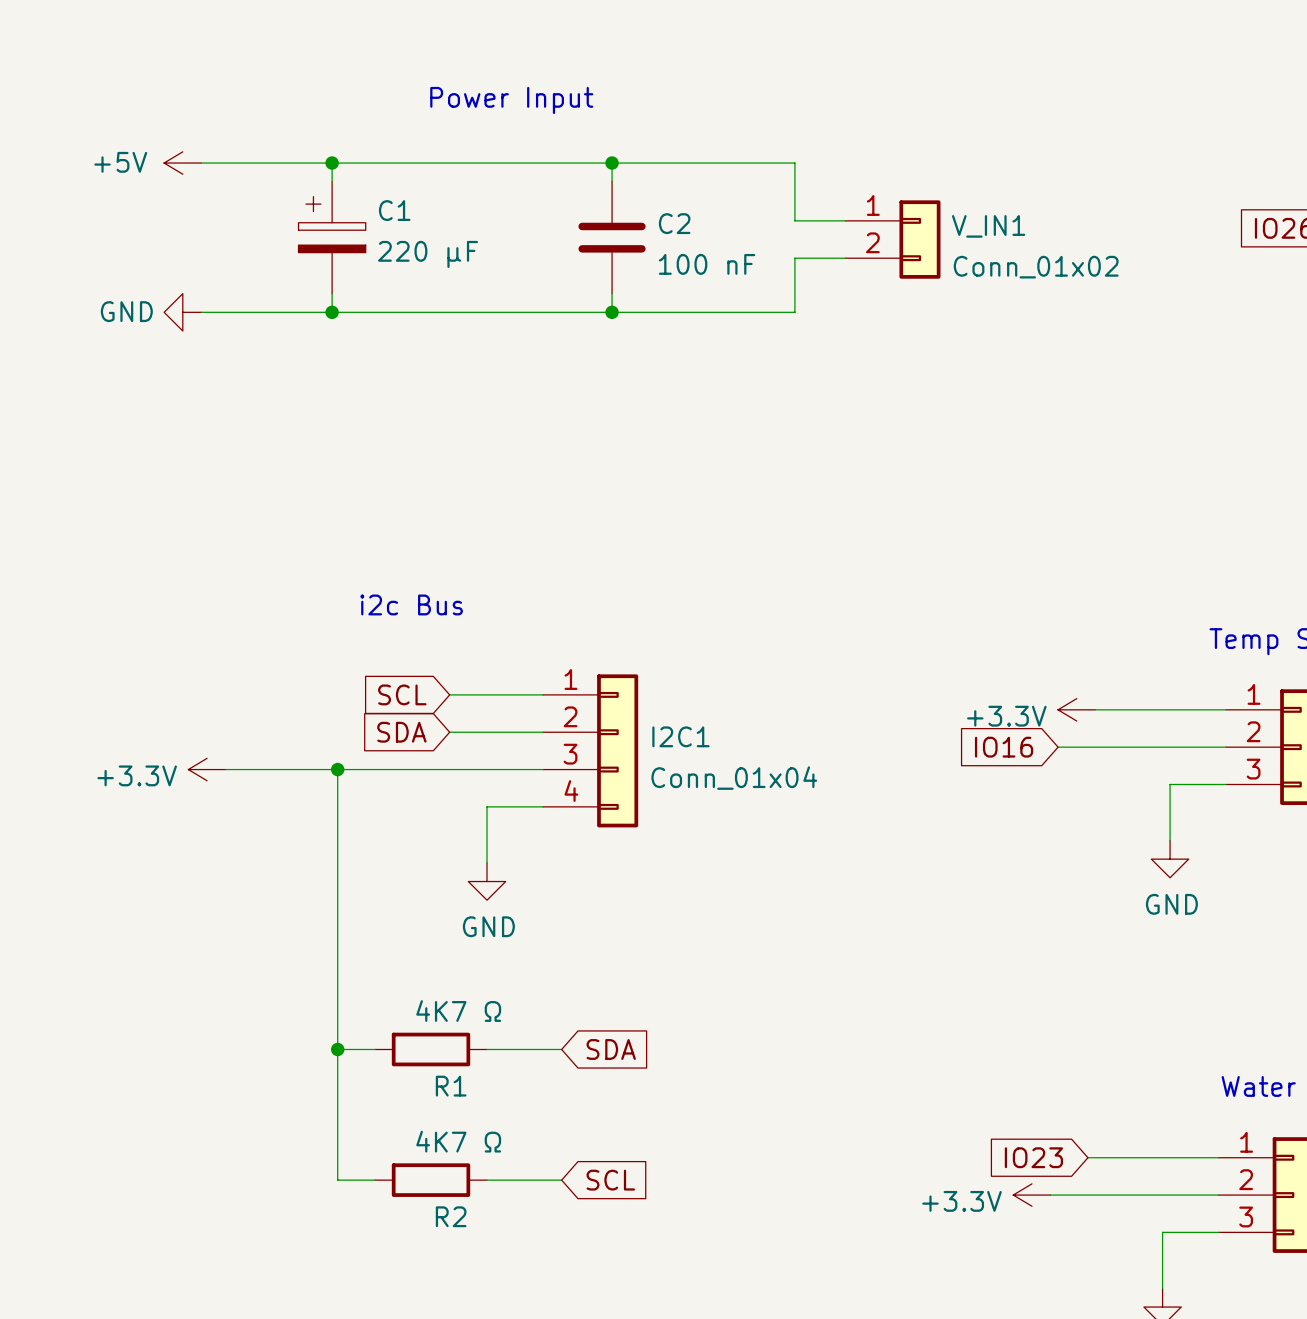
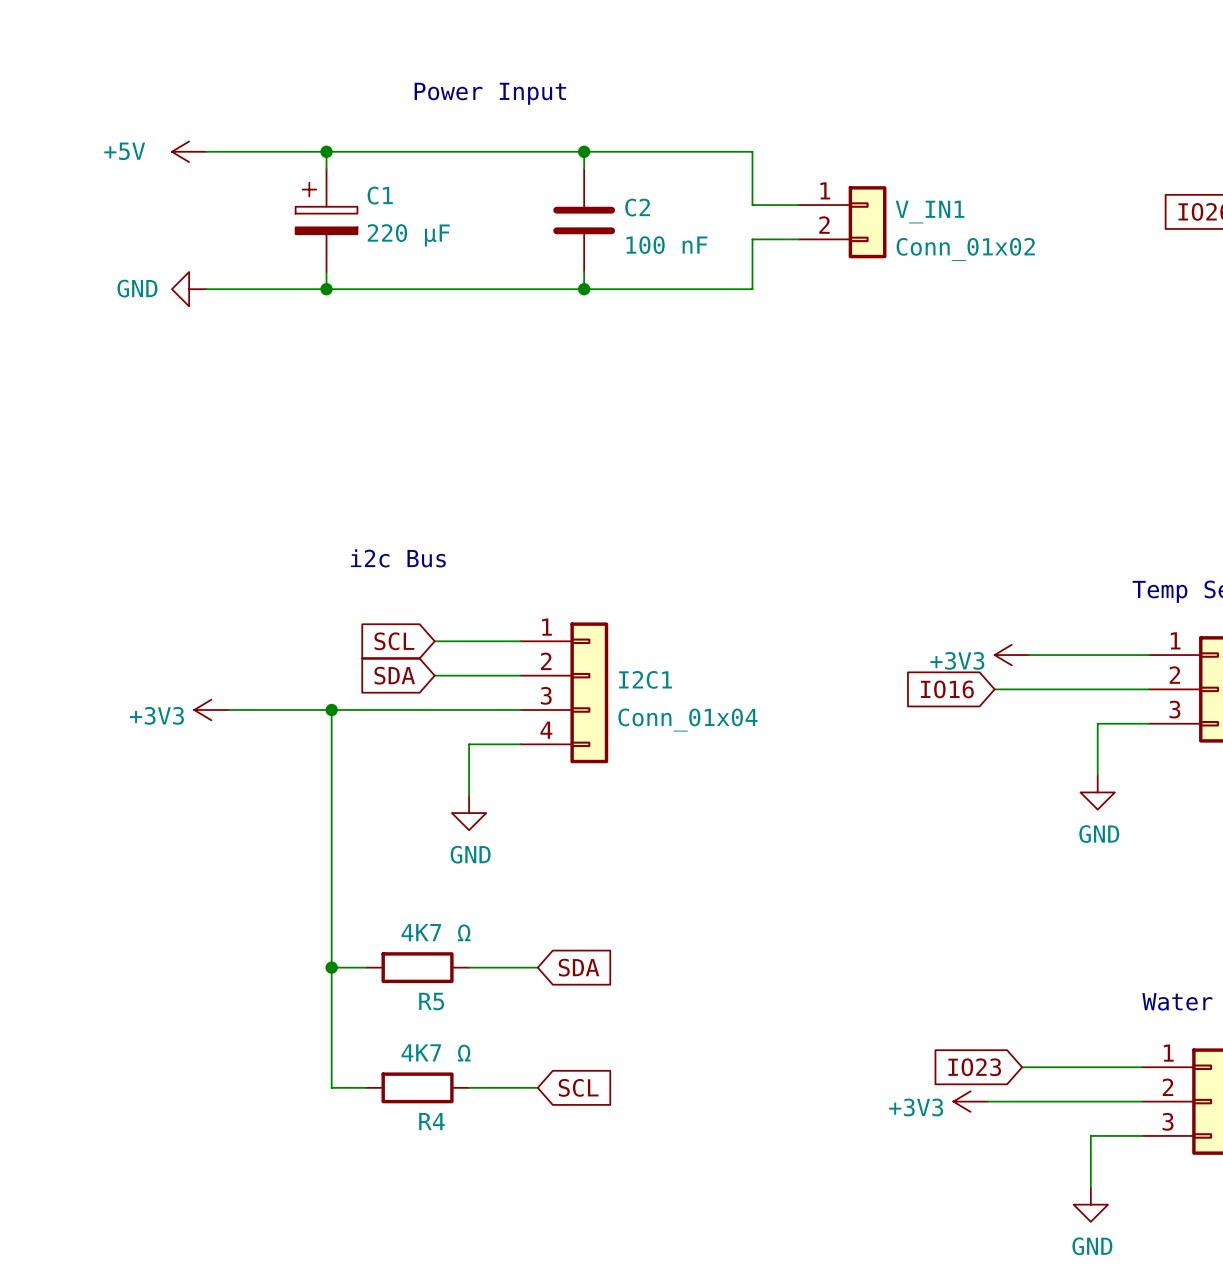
power symbol: +3.3V (1076, 709) -> +3V3 (1011, 655)
power symbol: +3.3V (207, 769) -> +3V3 (211, 710)
R1 name: R1 (451, 1086) -> R5 (431, 1001)
power symbol: +3.3V (1031, 1195) -> +3V3 (970, 1101)
R2 name: R2 (451, 1216) -> R4 (432, 1121)

